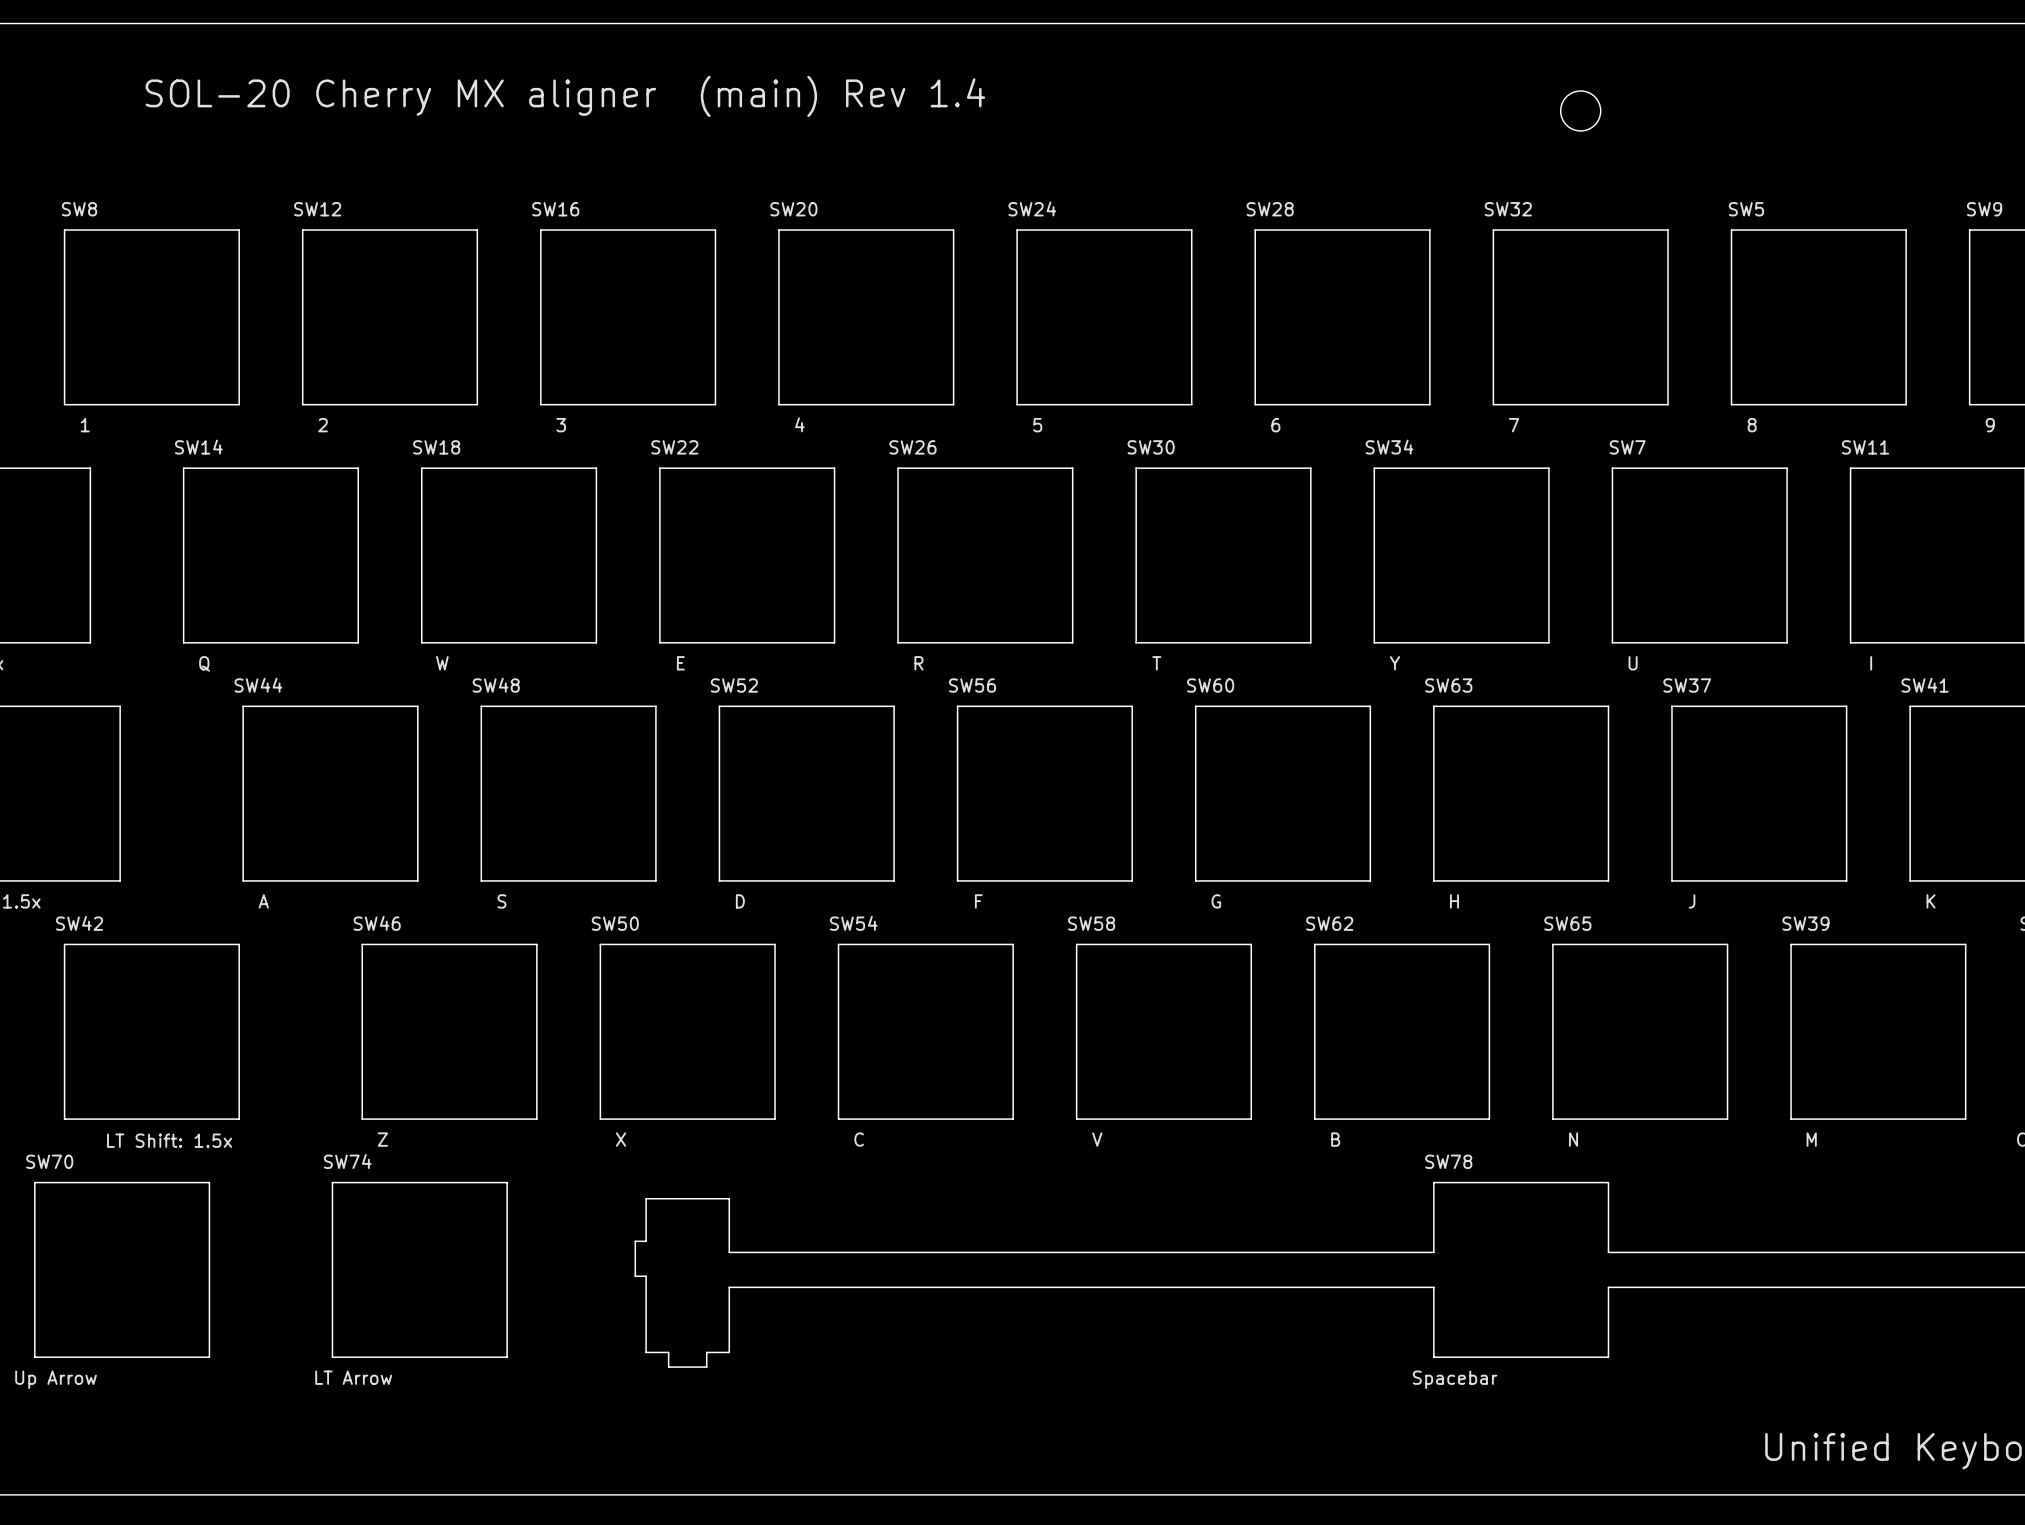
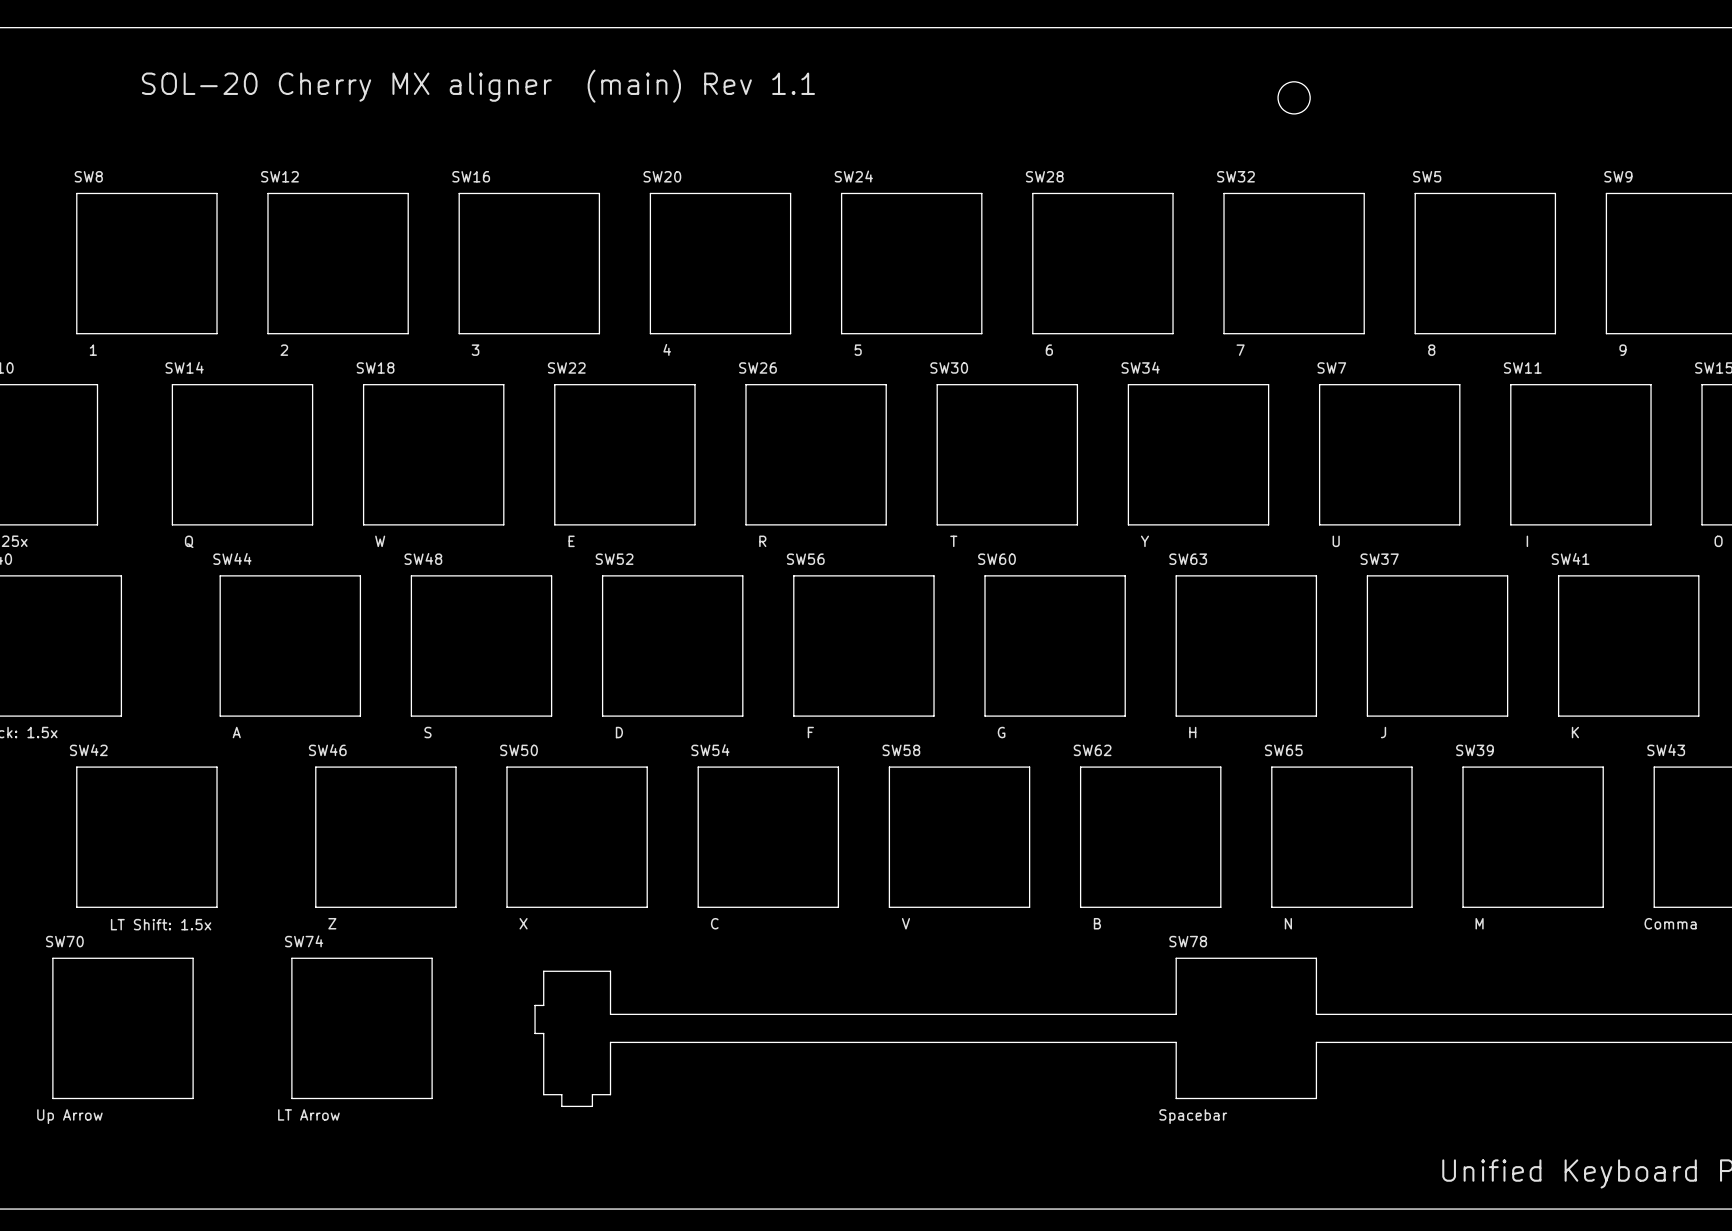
text: SOL-20 Cherry MX aligner (main) Rev 1.4 (565, 96) -> SOL-20 Cherry MX aligner (main) Rev 1.1 (478, 86)

